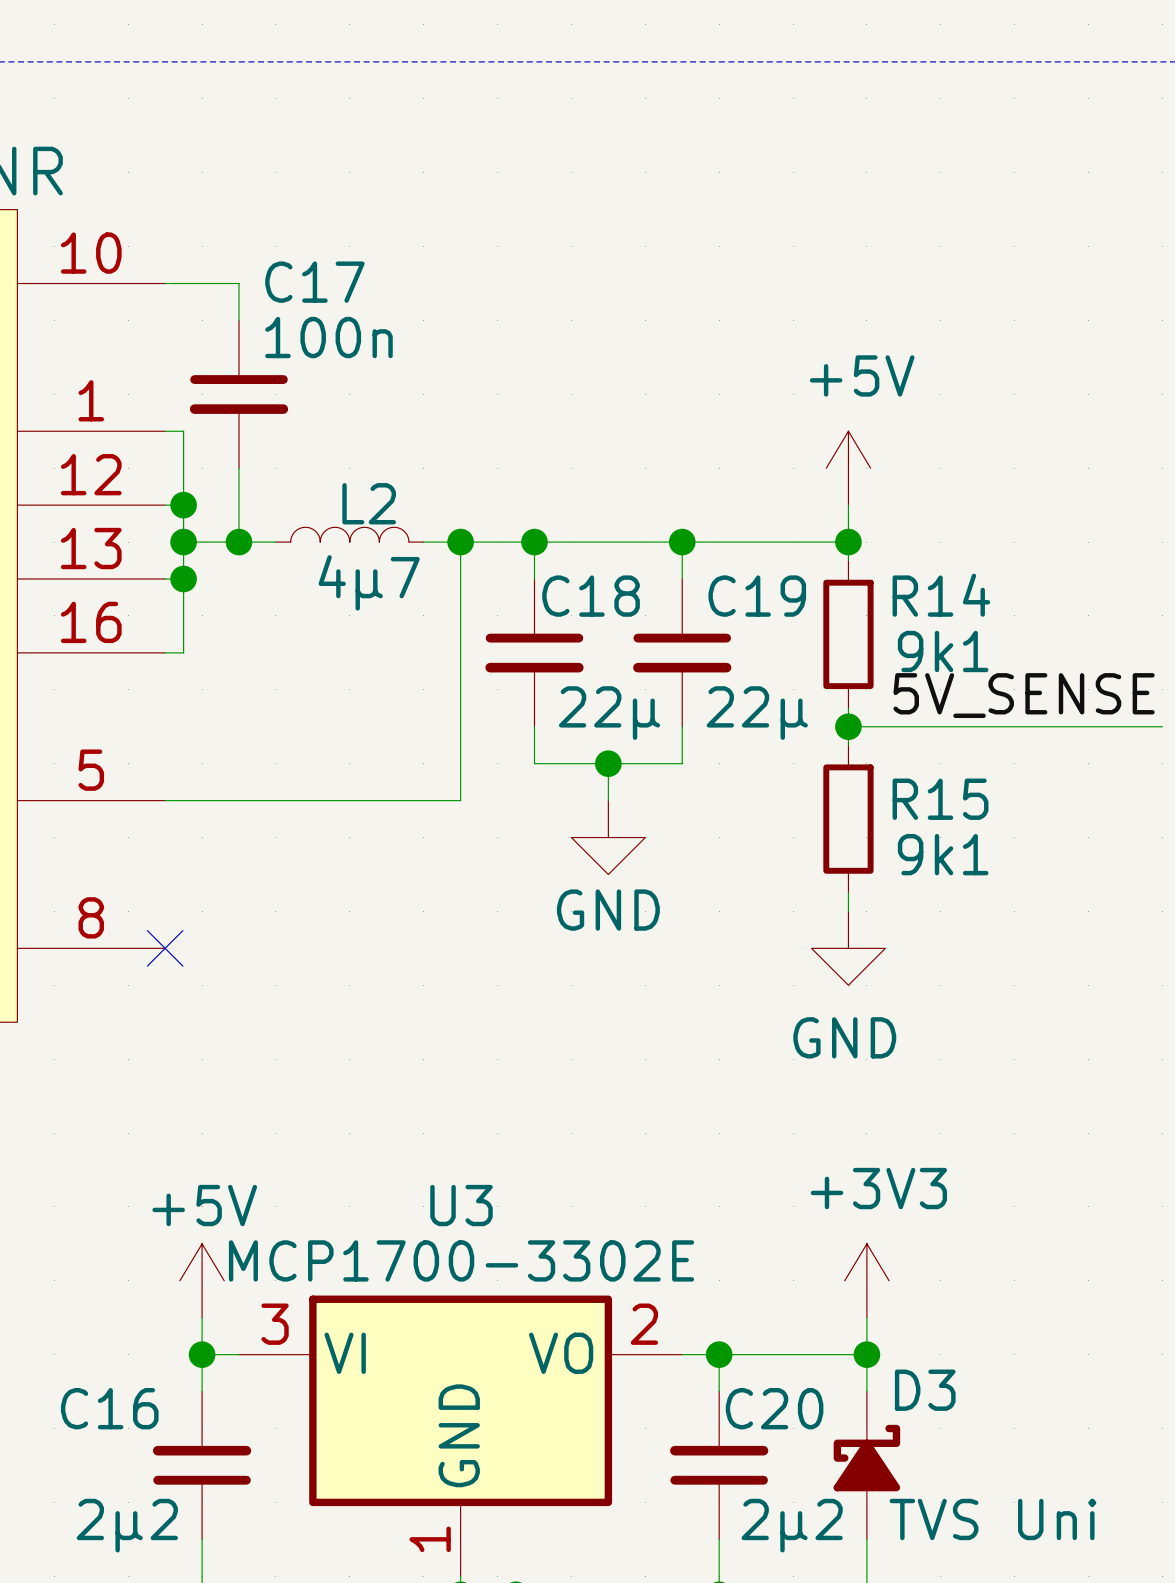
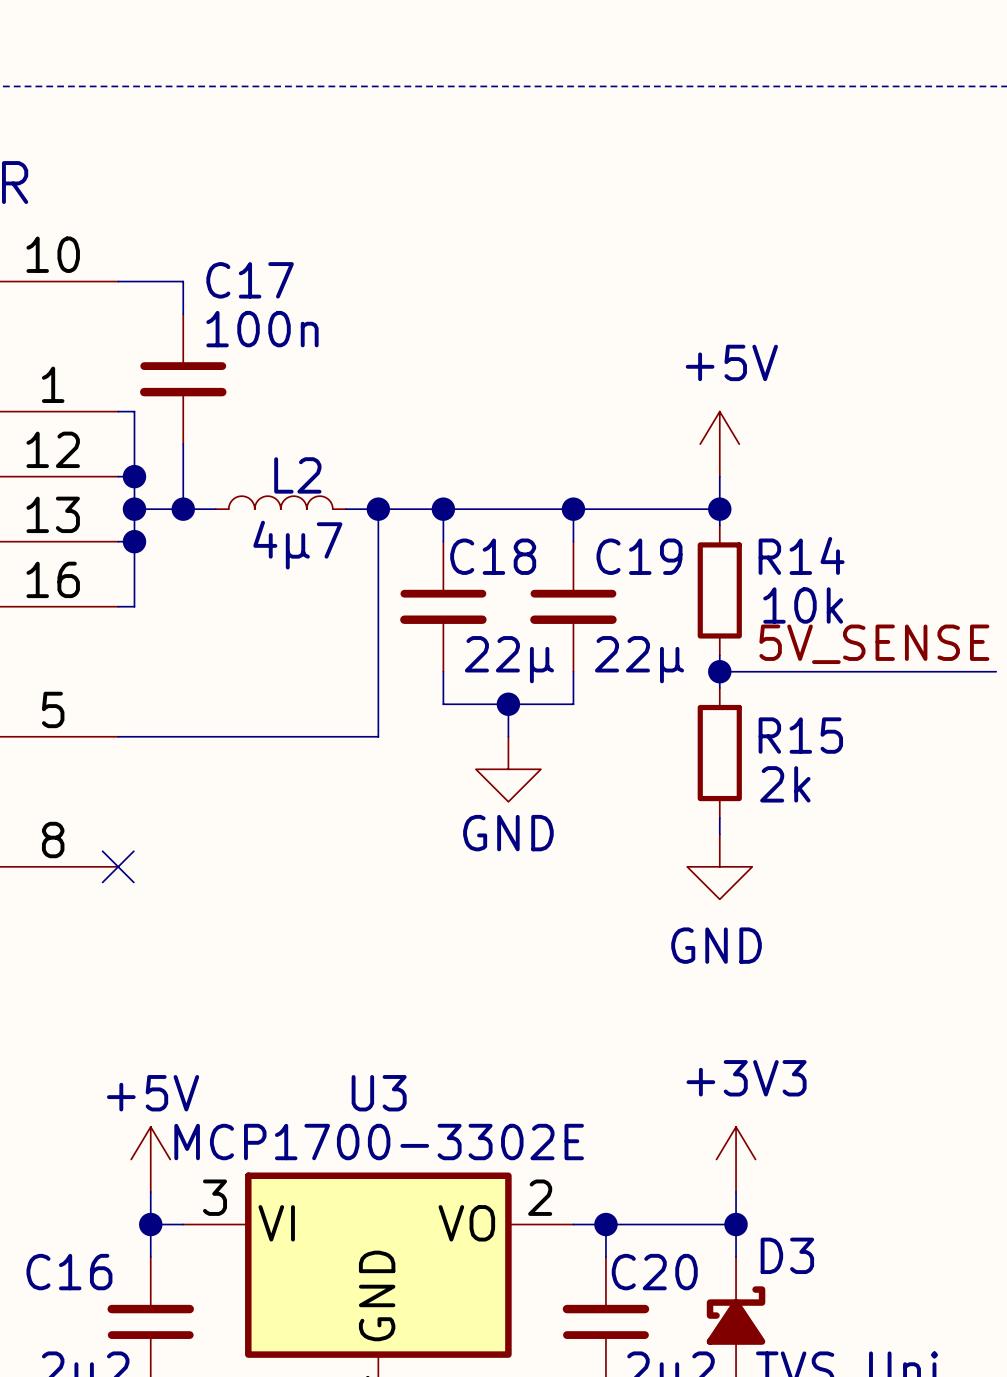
R14 value: 9k1 (943, 651) -> 10k (803, 605)
R15 value: 9k1 (943, 854) -> 2k (785, 784)

